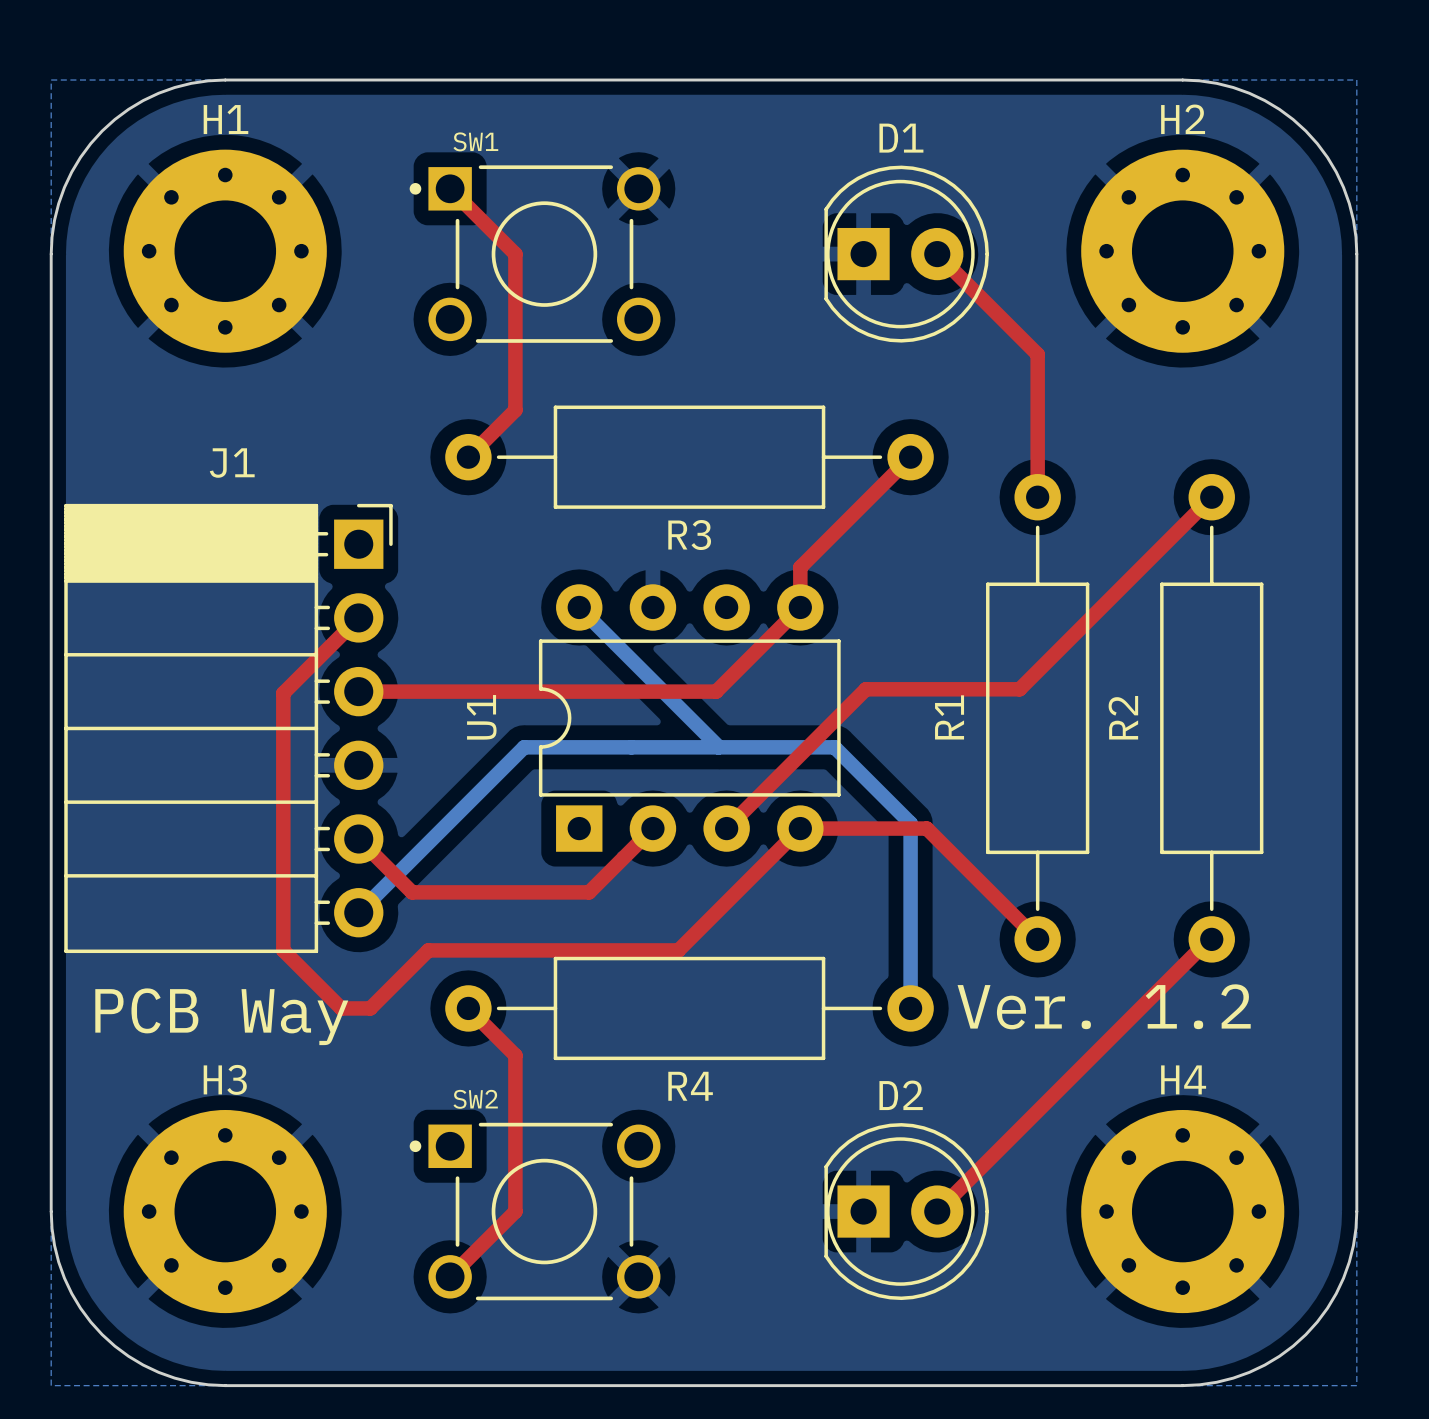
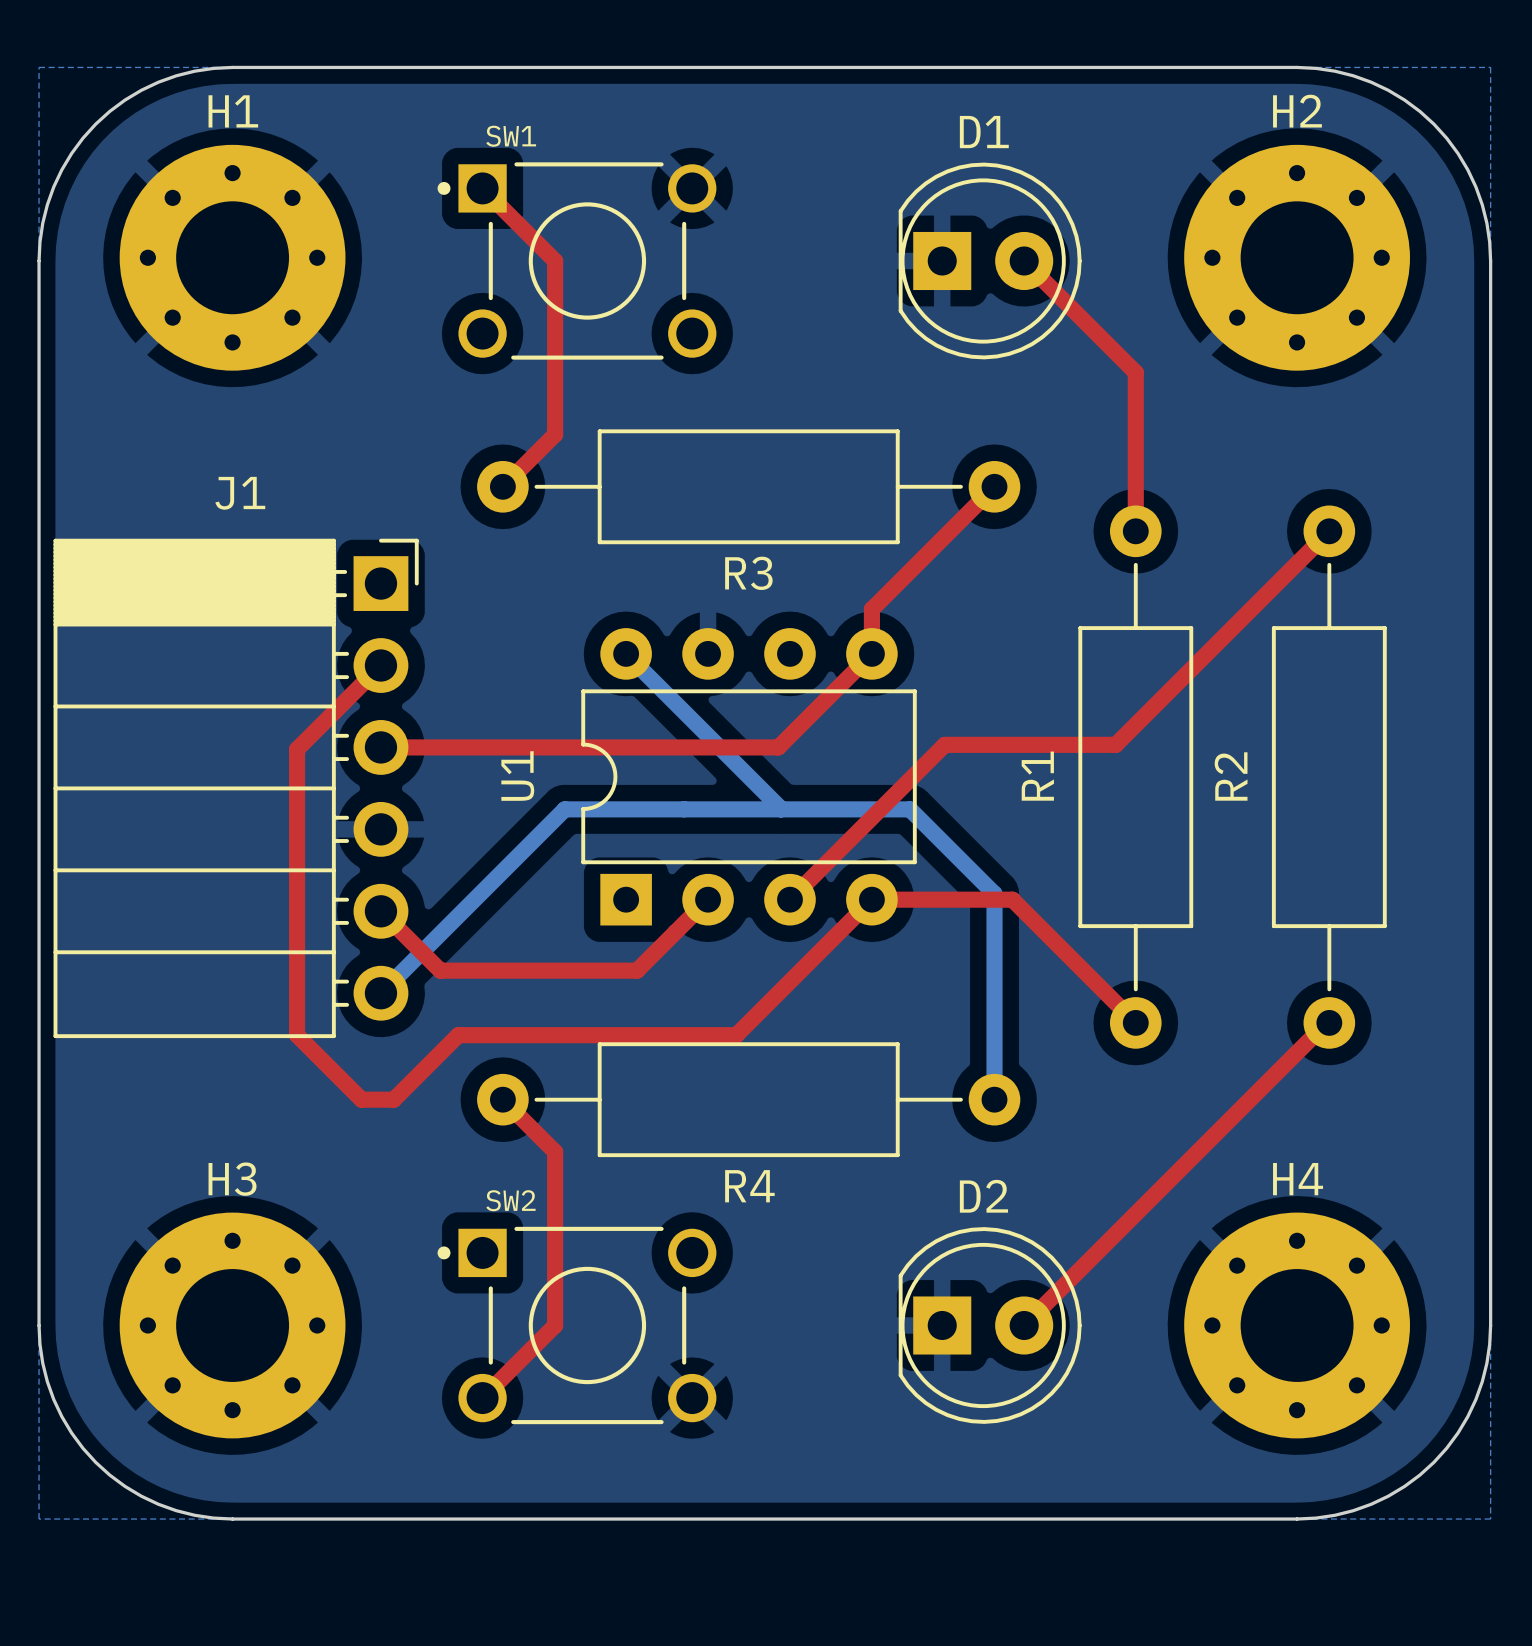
text: Ver. 1.2 (1104, 1006) -> none
text: PCB Way (221, 1016) -> none

